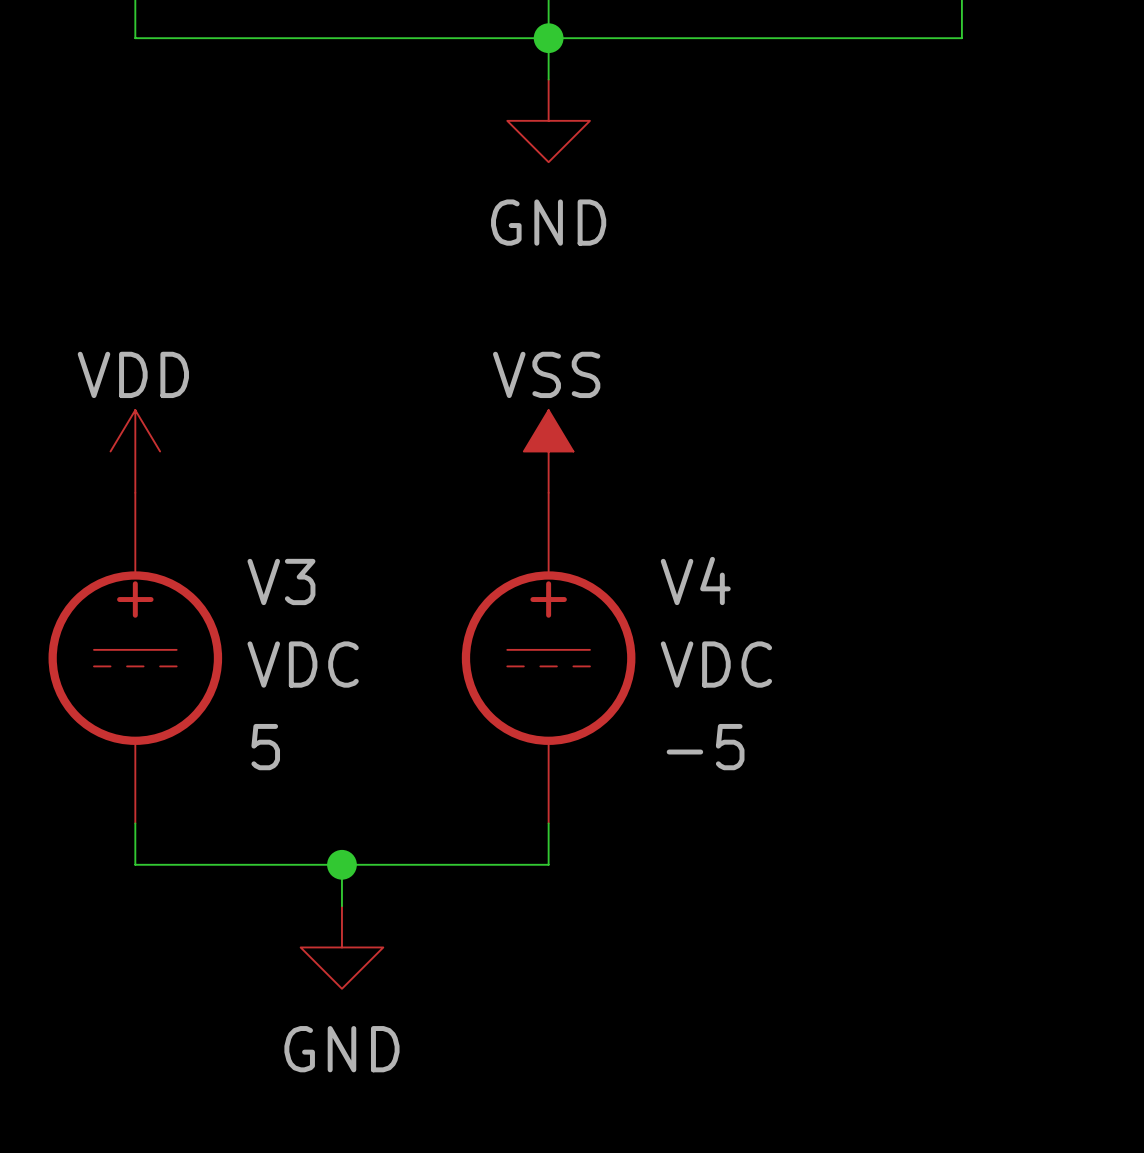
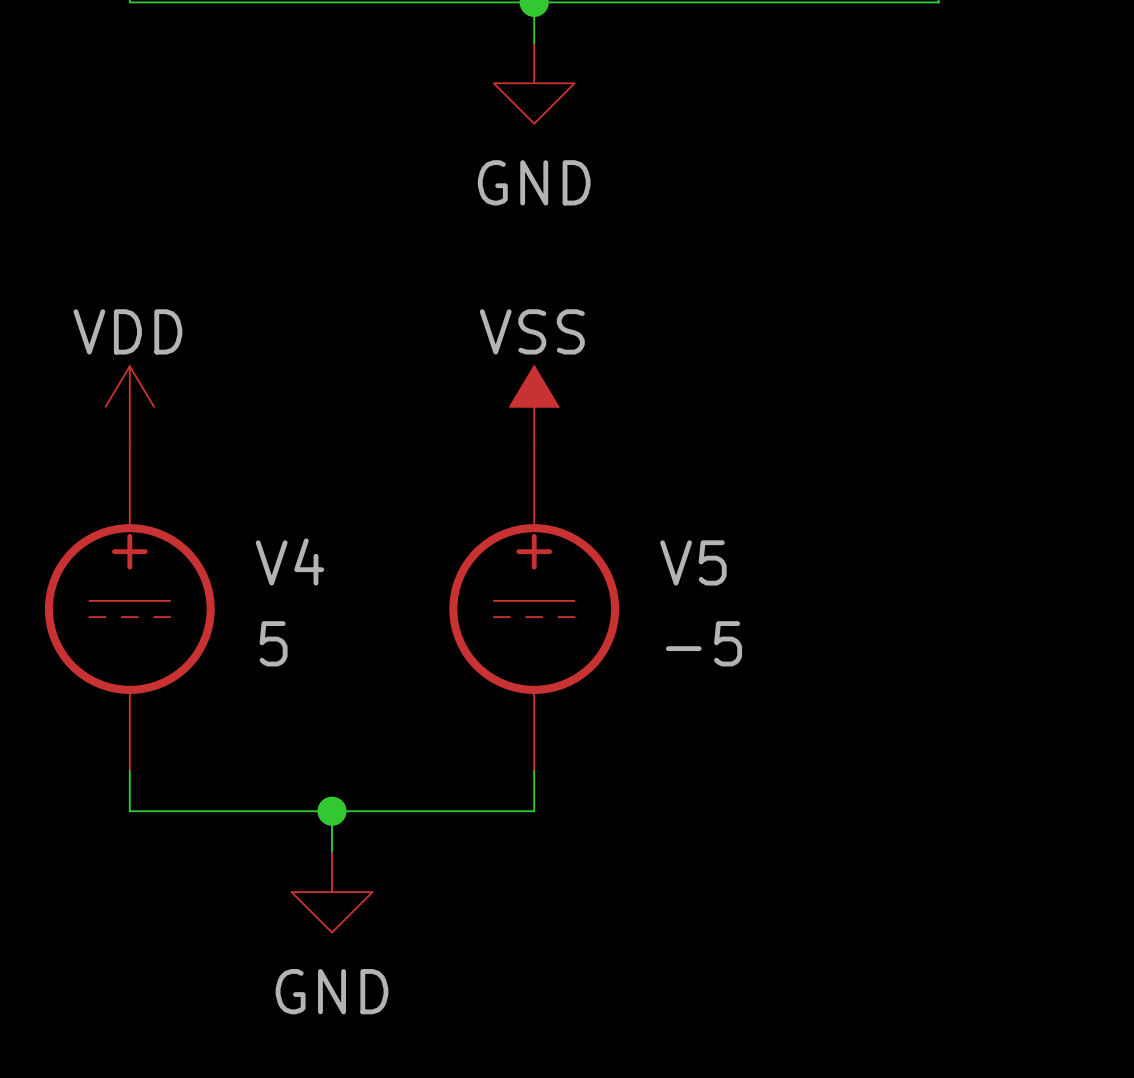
V4 name: V4 (695, 580) -> V5 (693, 562)
V3 name: V3 (281, 581) -> V4 (289, 561)
V3 value: VDC (303, 664) -> 5 (273, 643)
V4 value: VDC (716, 664) -> -5 (703, 643)
V3 text: 5 (265, 747) -> none
V4 text: -5 (705, 747) -> none

